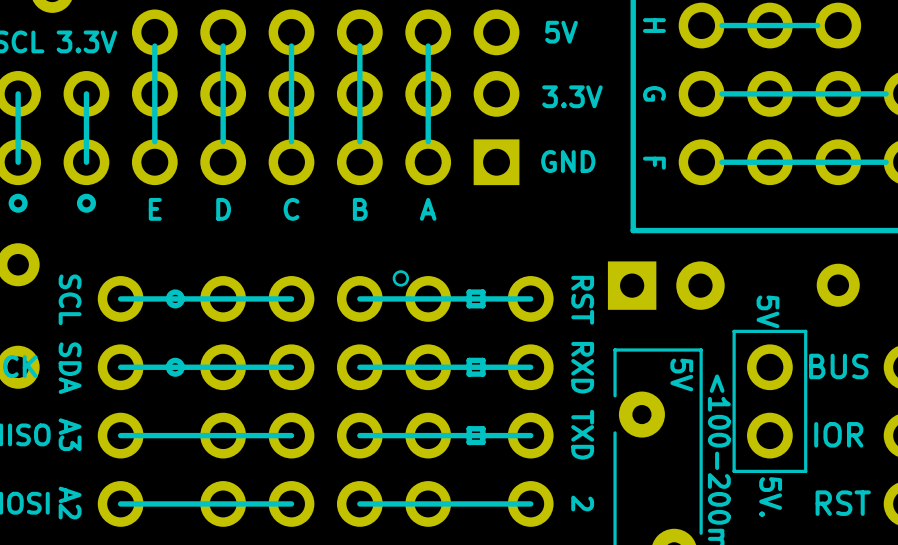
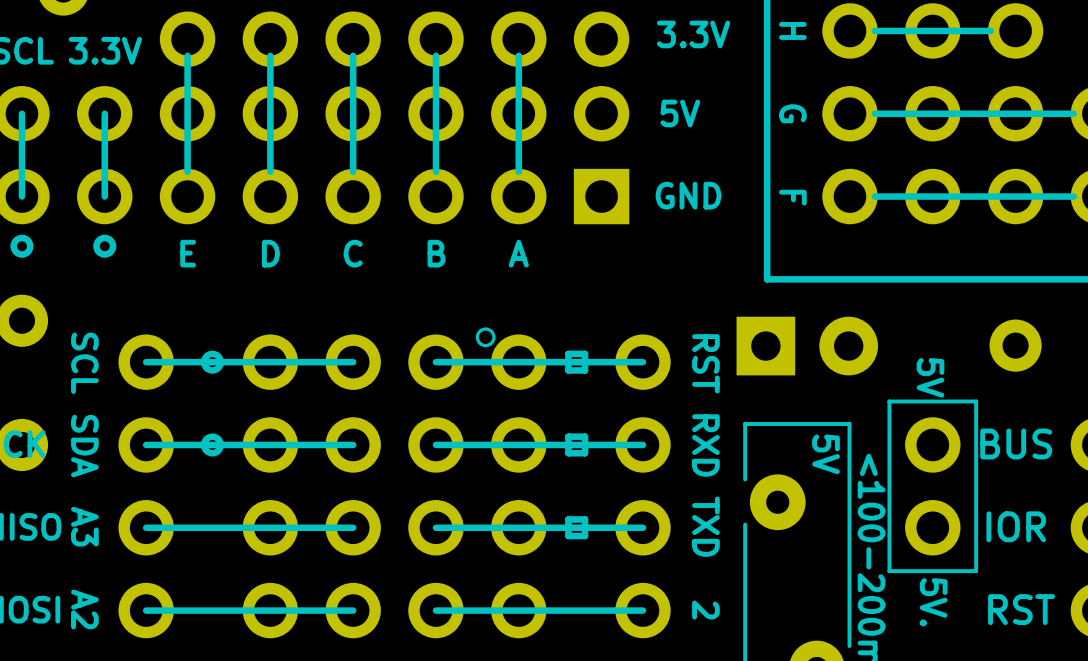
text: 5V (561, 32) -> 3.3V (693, 34)
text: 3.3V (572, 96) -> 5V (680, 113)

